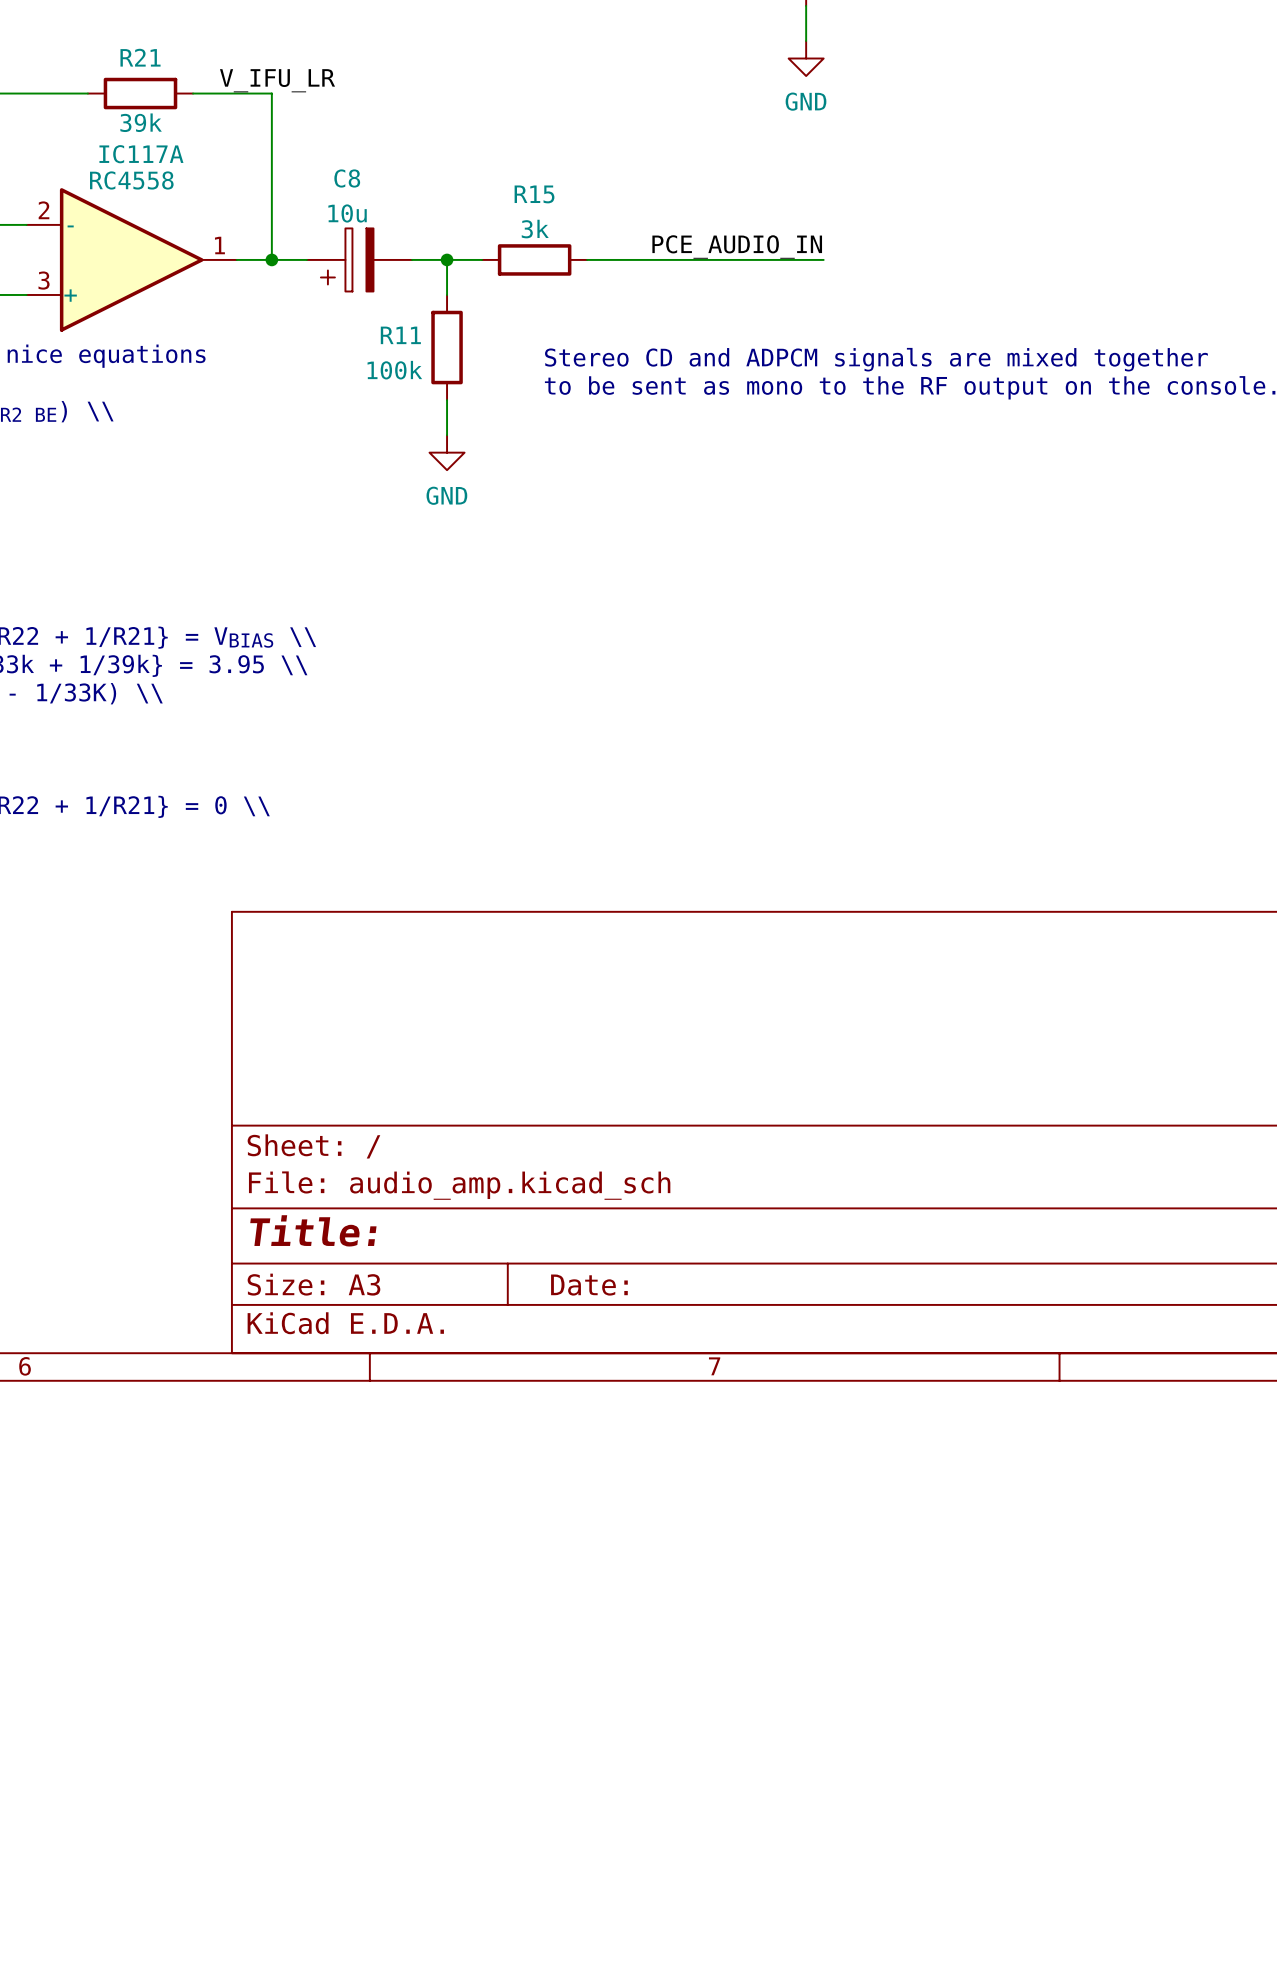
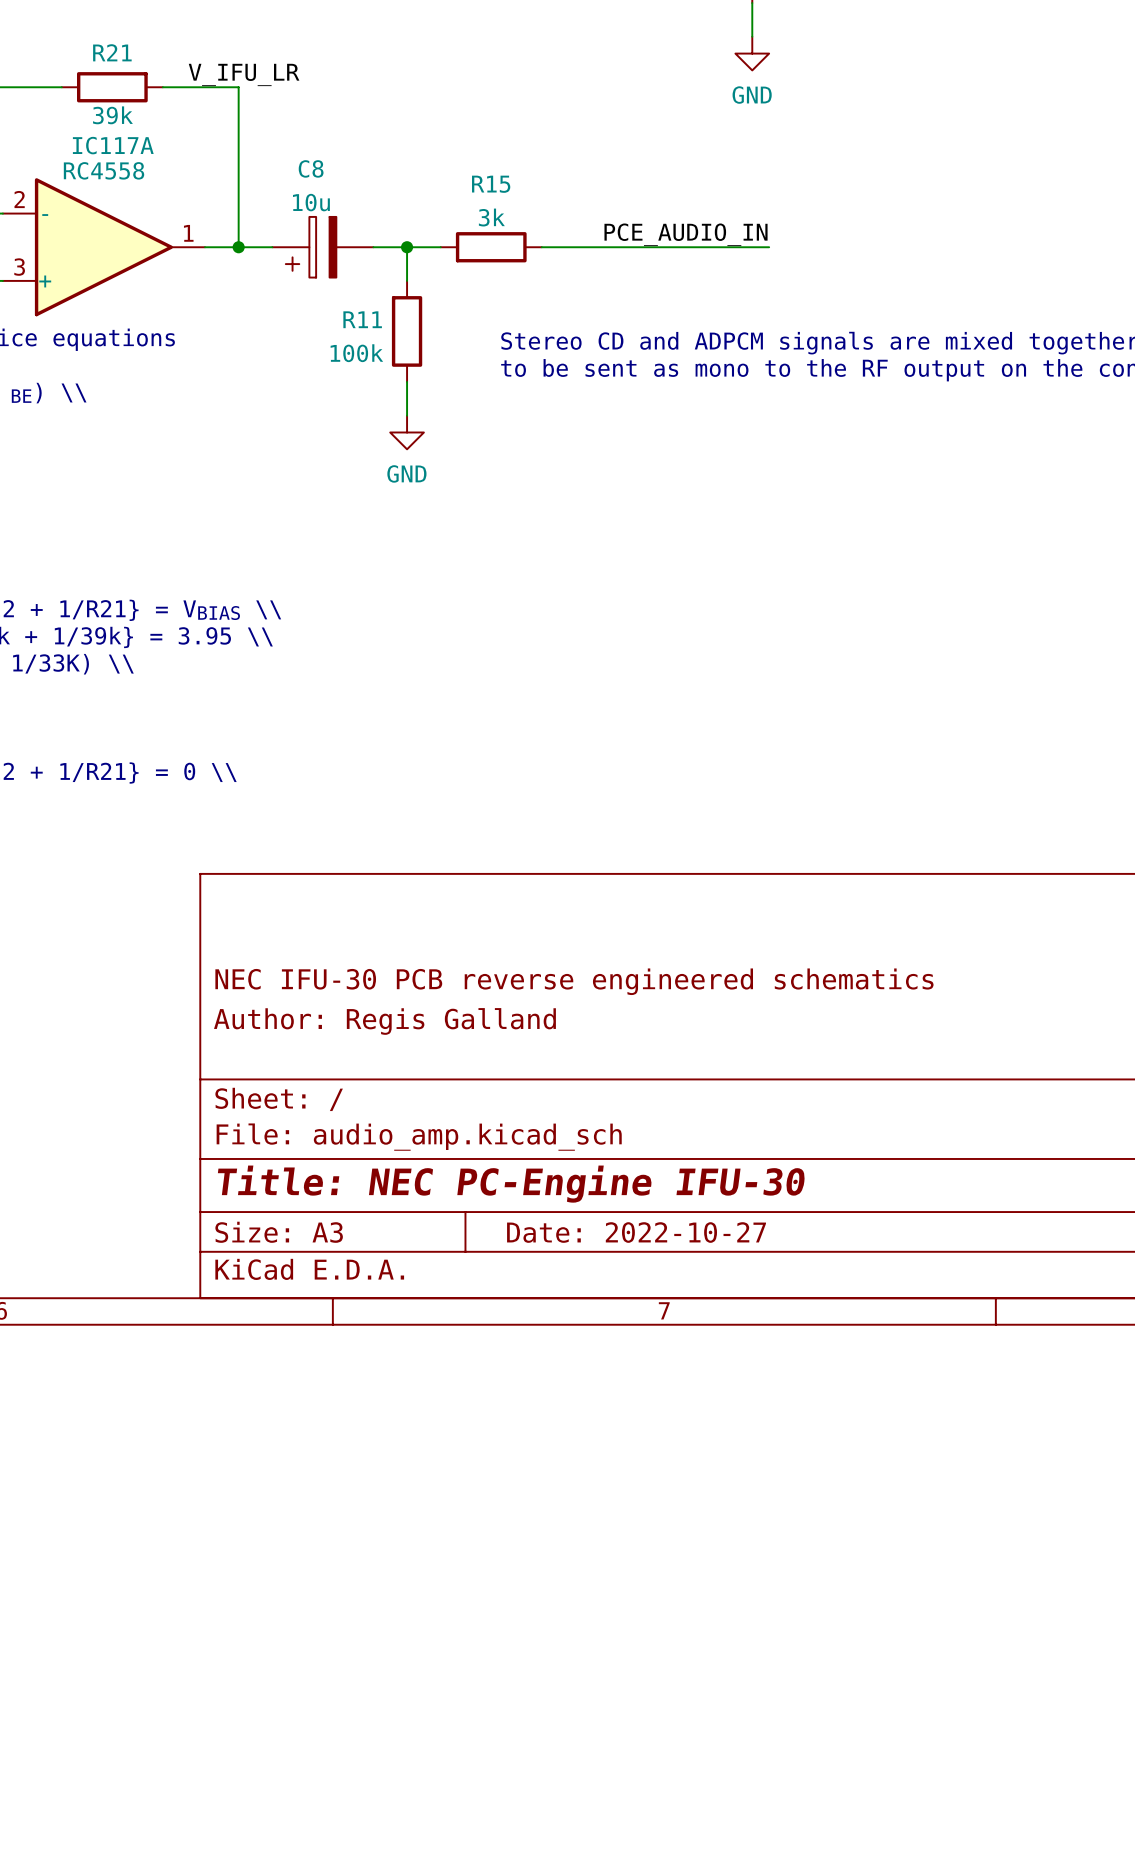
title block: none -> NEC IFU-30 PCB reverse engineered schematics (574, 981)
title block: none -> Author: Regis Galland (384, 1021)
title block: Title: (313, 1230) -> Title: NEC PC-Engine IFU-30 (511, 1184)
title block: Date: (589, 1285) -> Date: 2022-10-27 (636, 1232)

